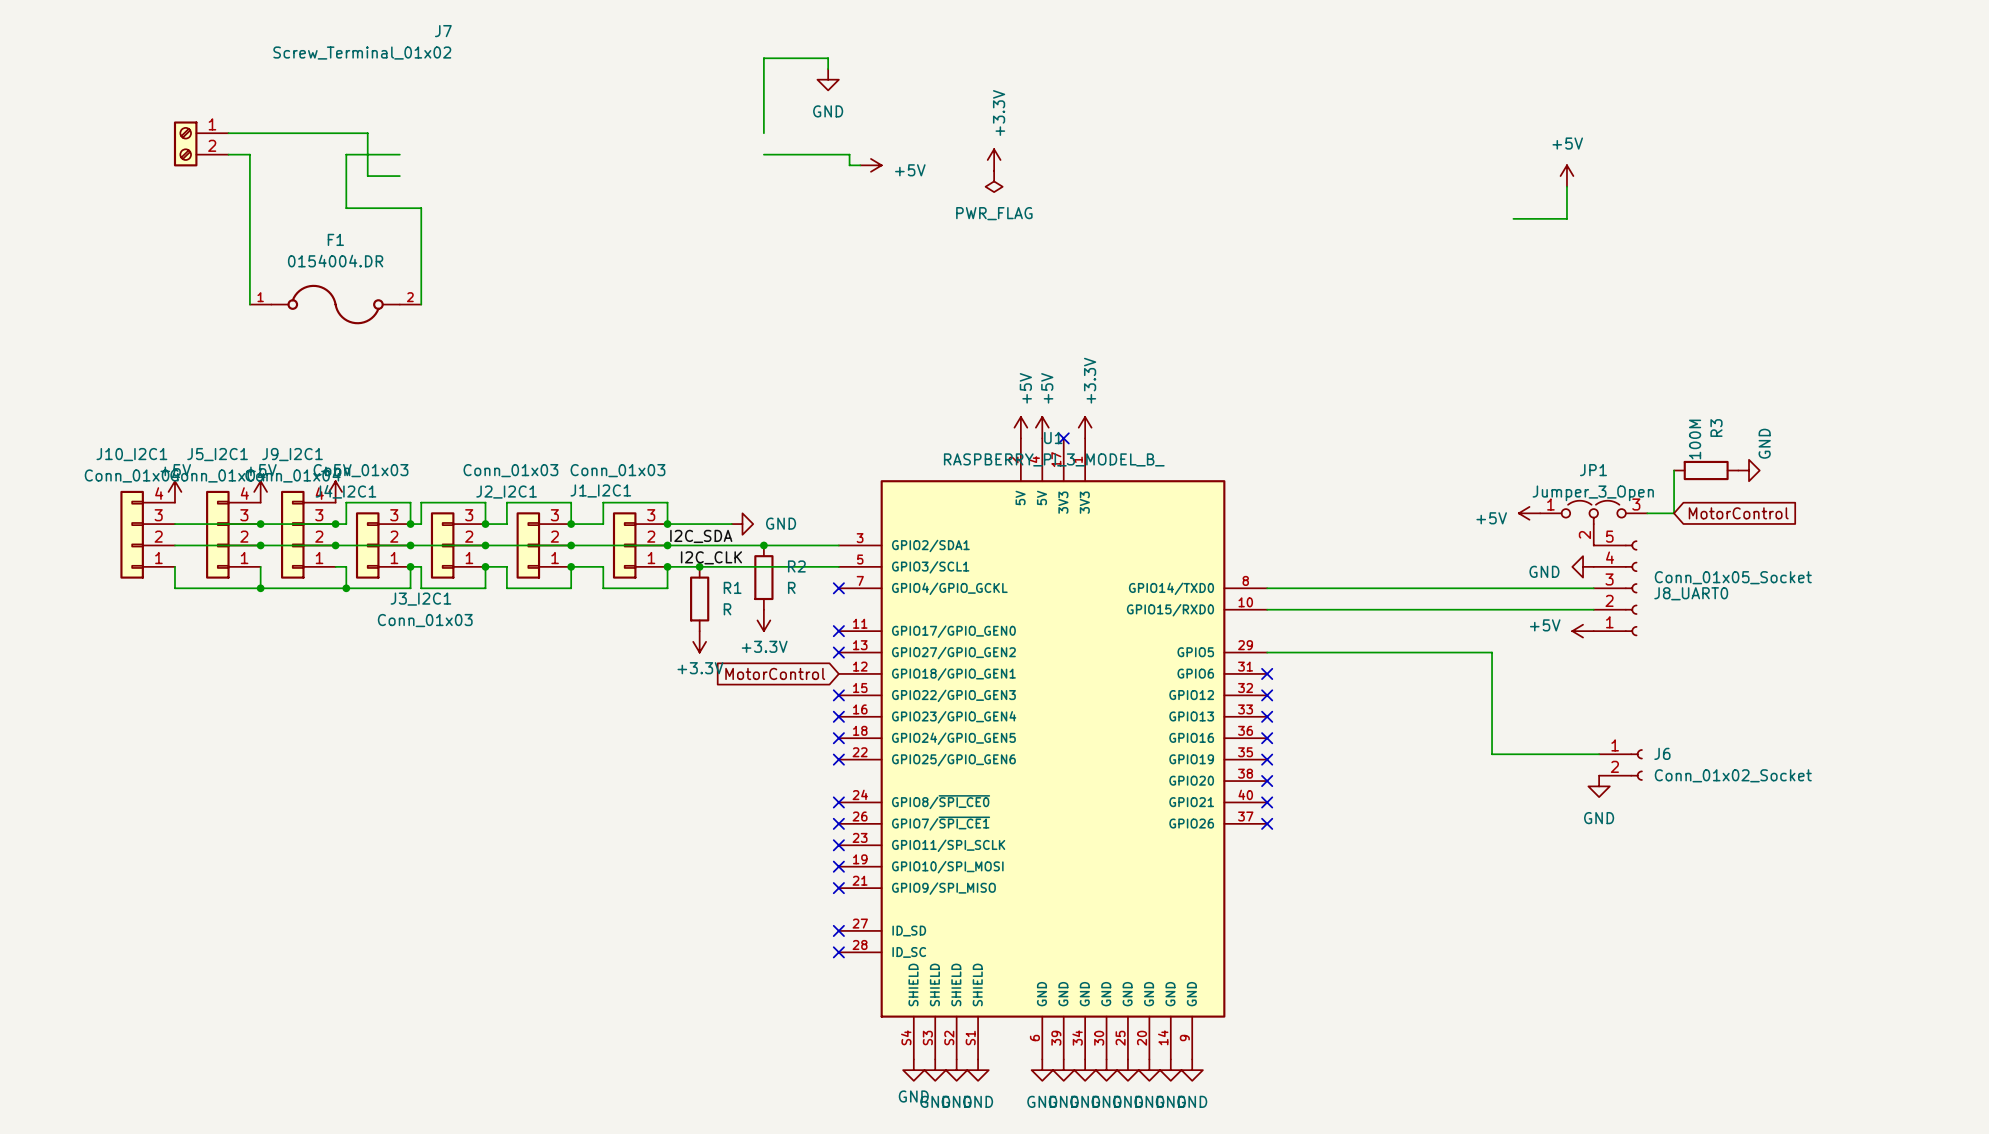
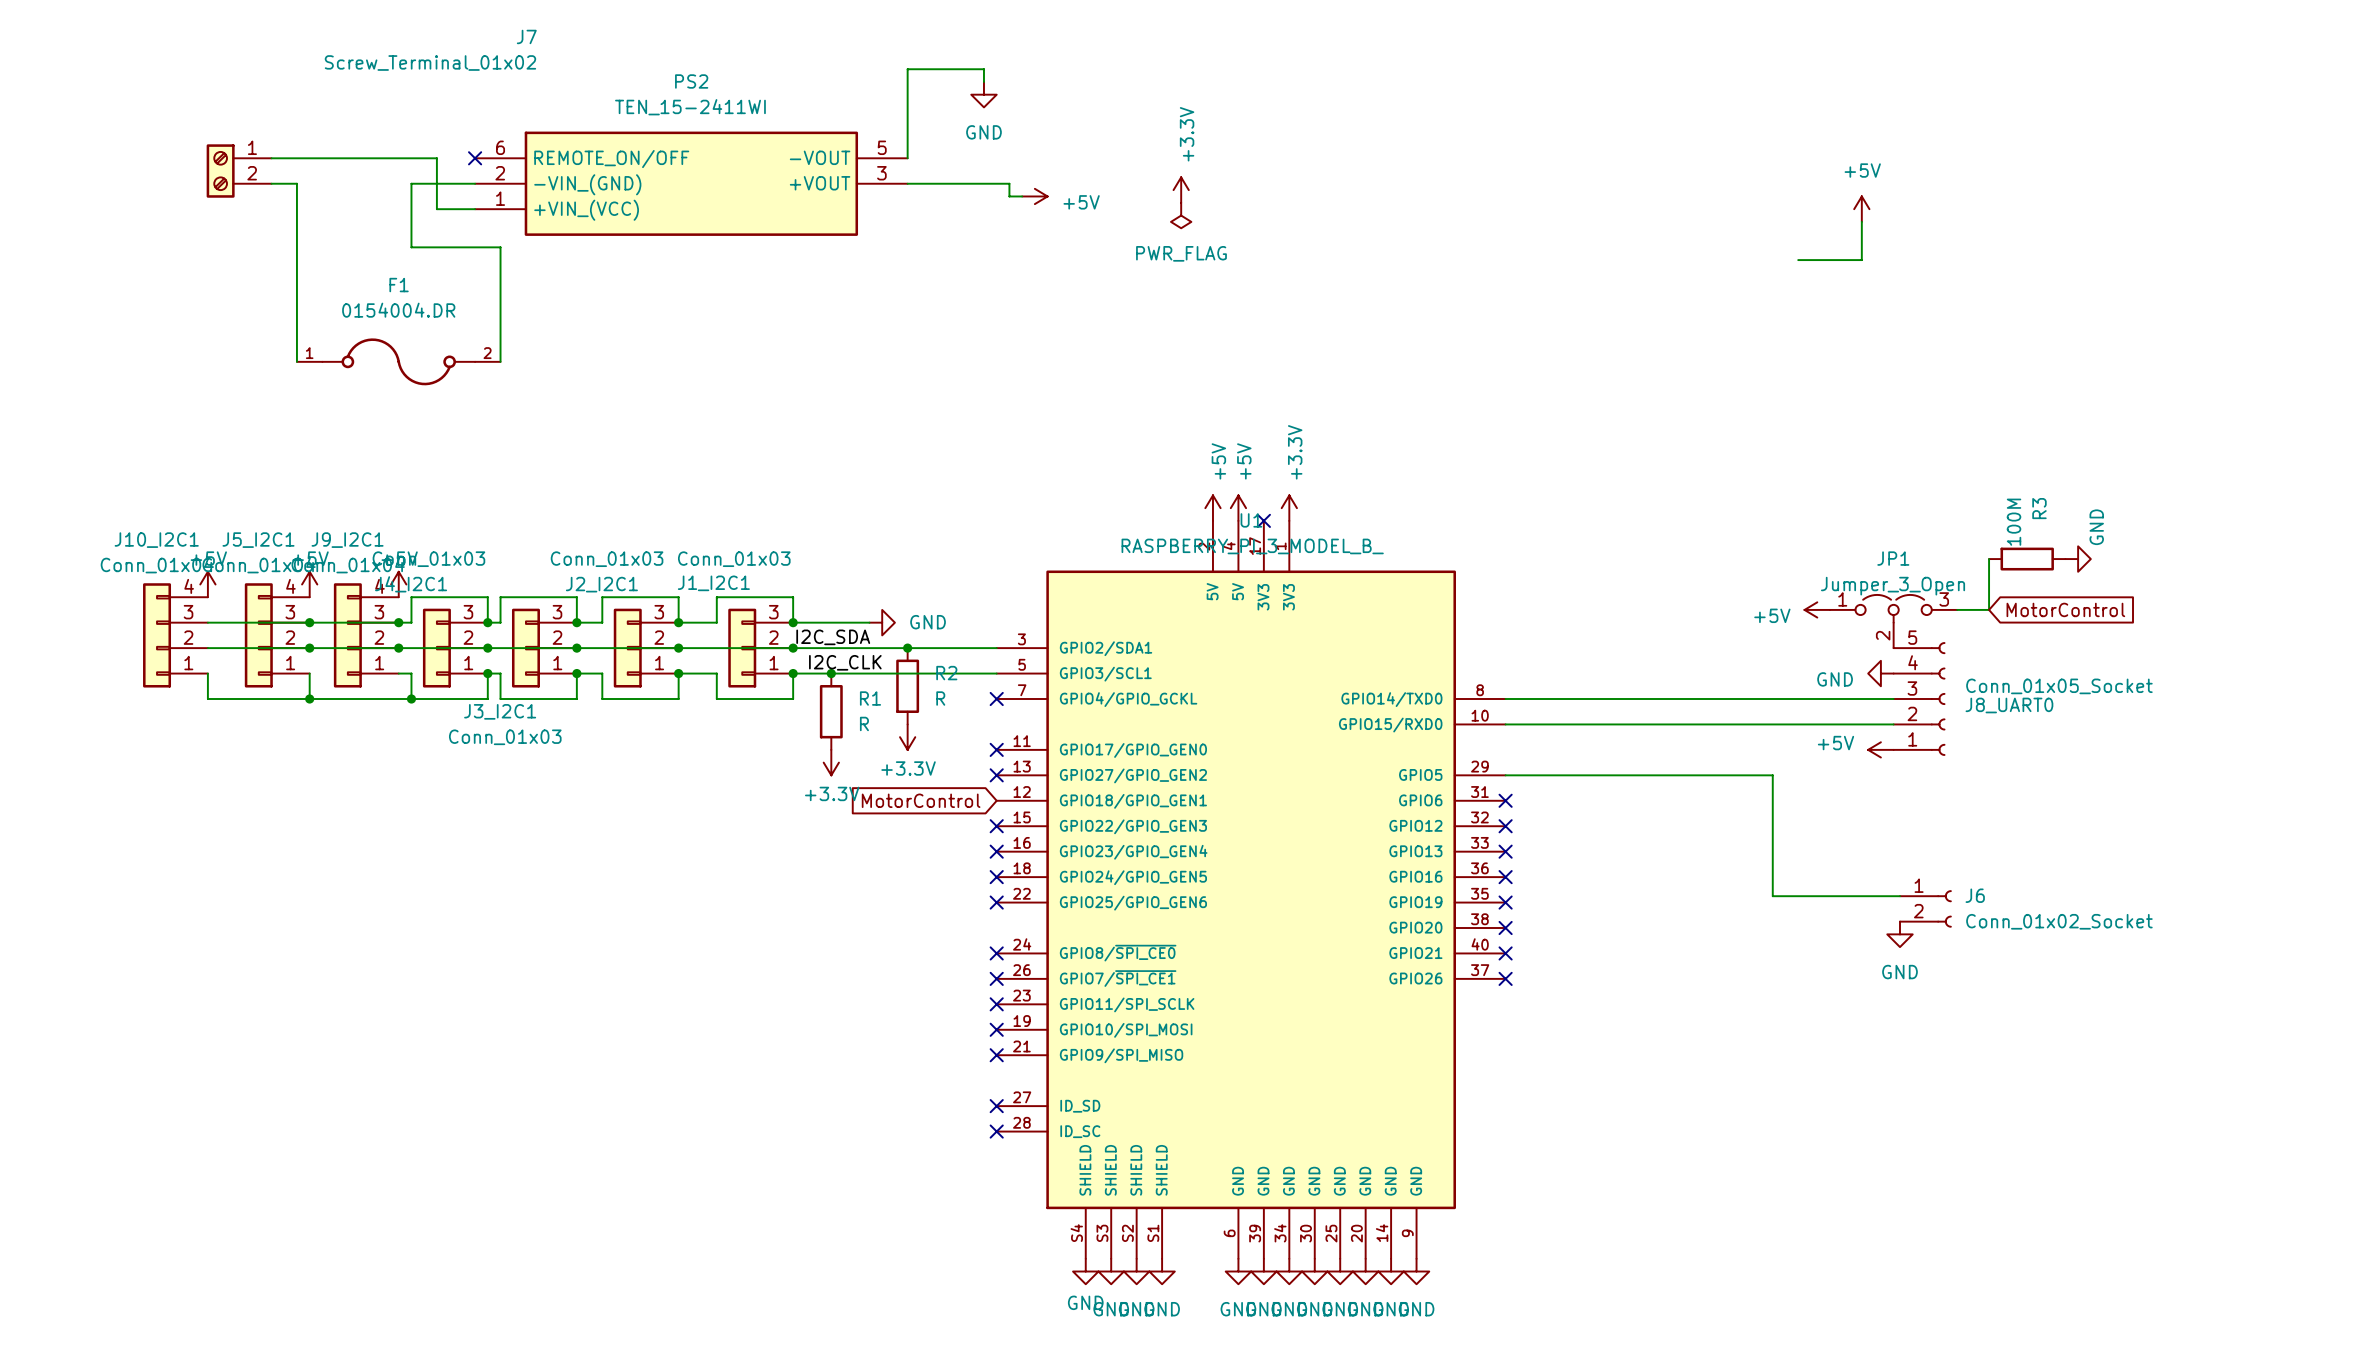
no-connect mark: none -> (475, 158)
PS2: none -> TEN_15-2411WI (691, 183)

